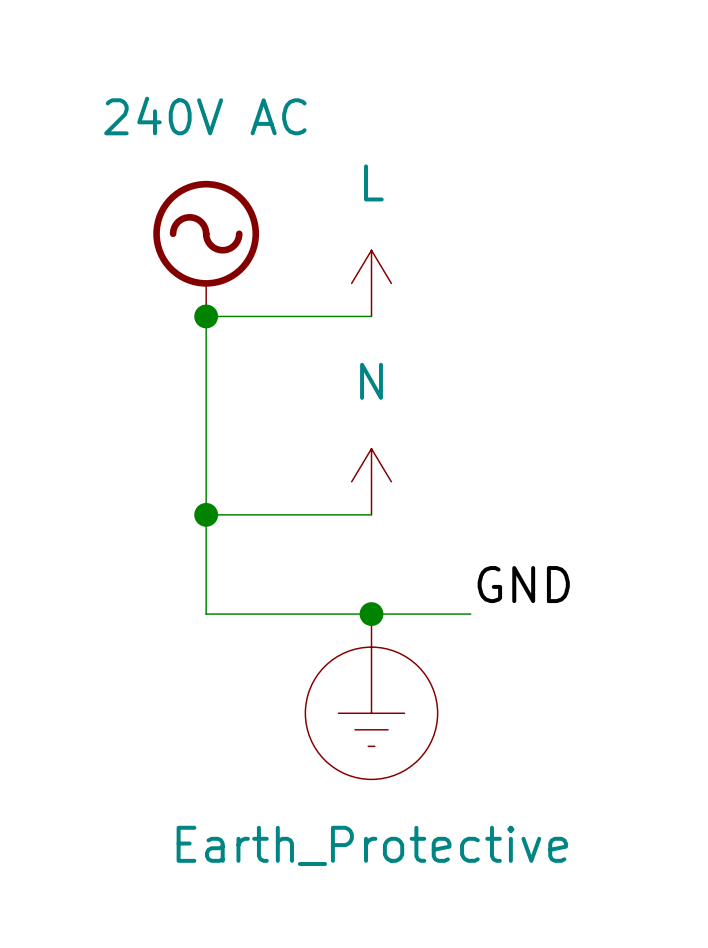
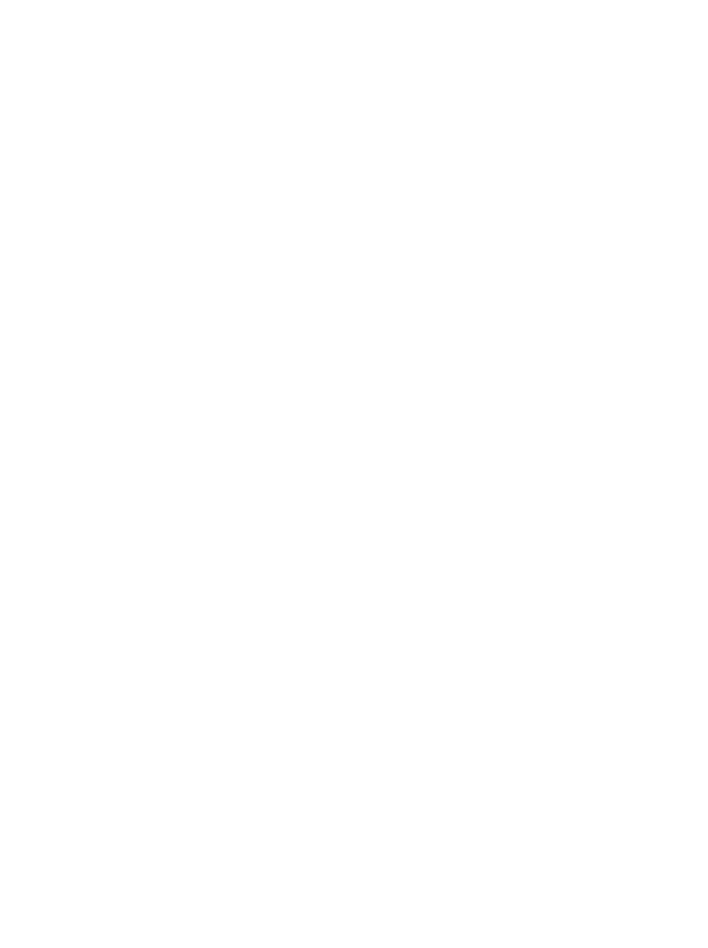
power symbol: 240V AC (206, 248) -> none
power symbol: L (371, 283) -> none
junction: (206, 316) -> none
wire: (371, 316) (206, 316) (206, 614) (470, 614) -> none
power symbol: N (371, 481) -> none
wire: (206, 514) (371, 514) -> none
junction: (206, 514) -> none
label: GND (523, 584) -> none
junction: (371, 614) -> none
power symbol: Earth_Protective (371, 696) -> none

